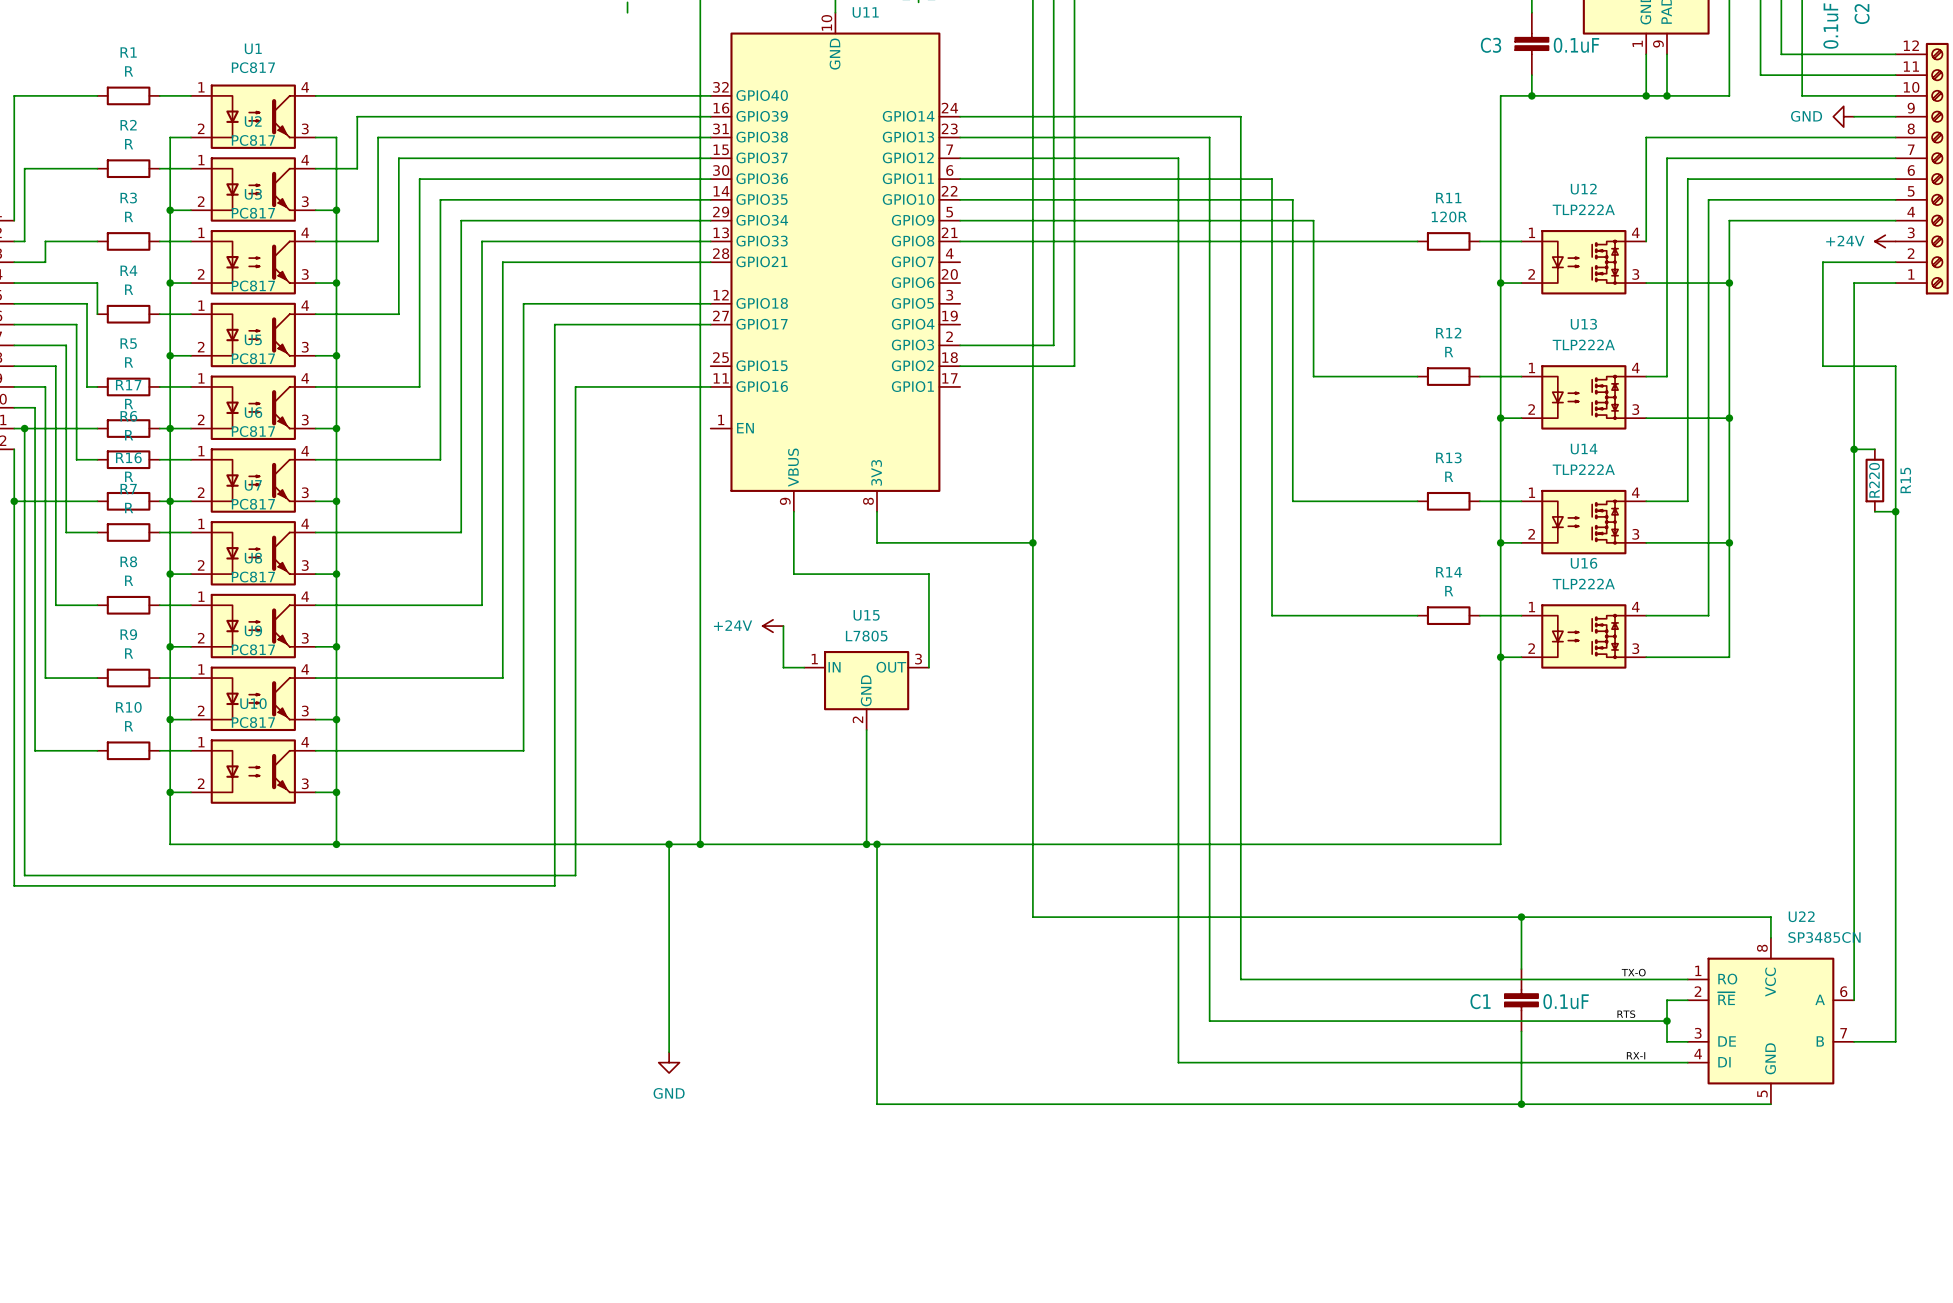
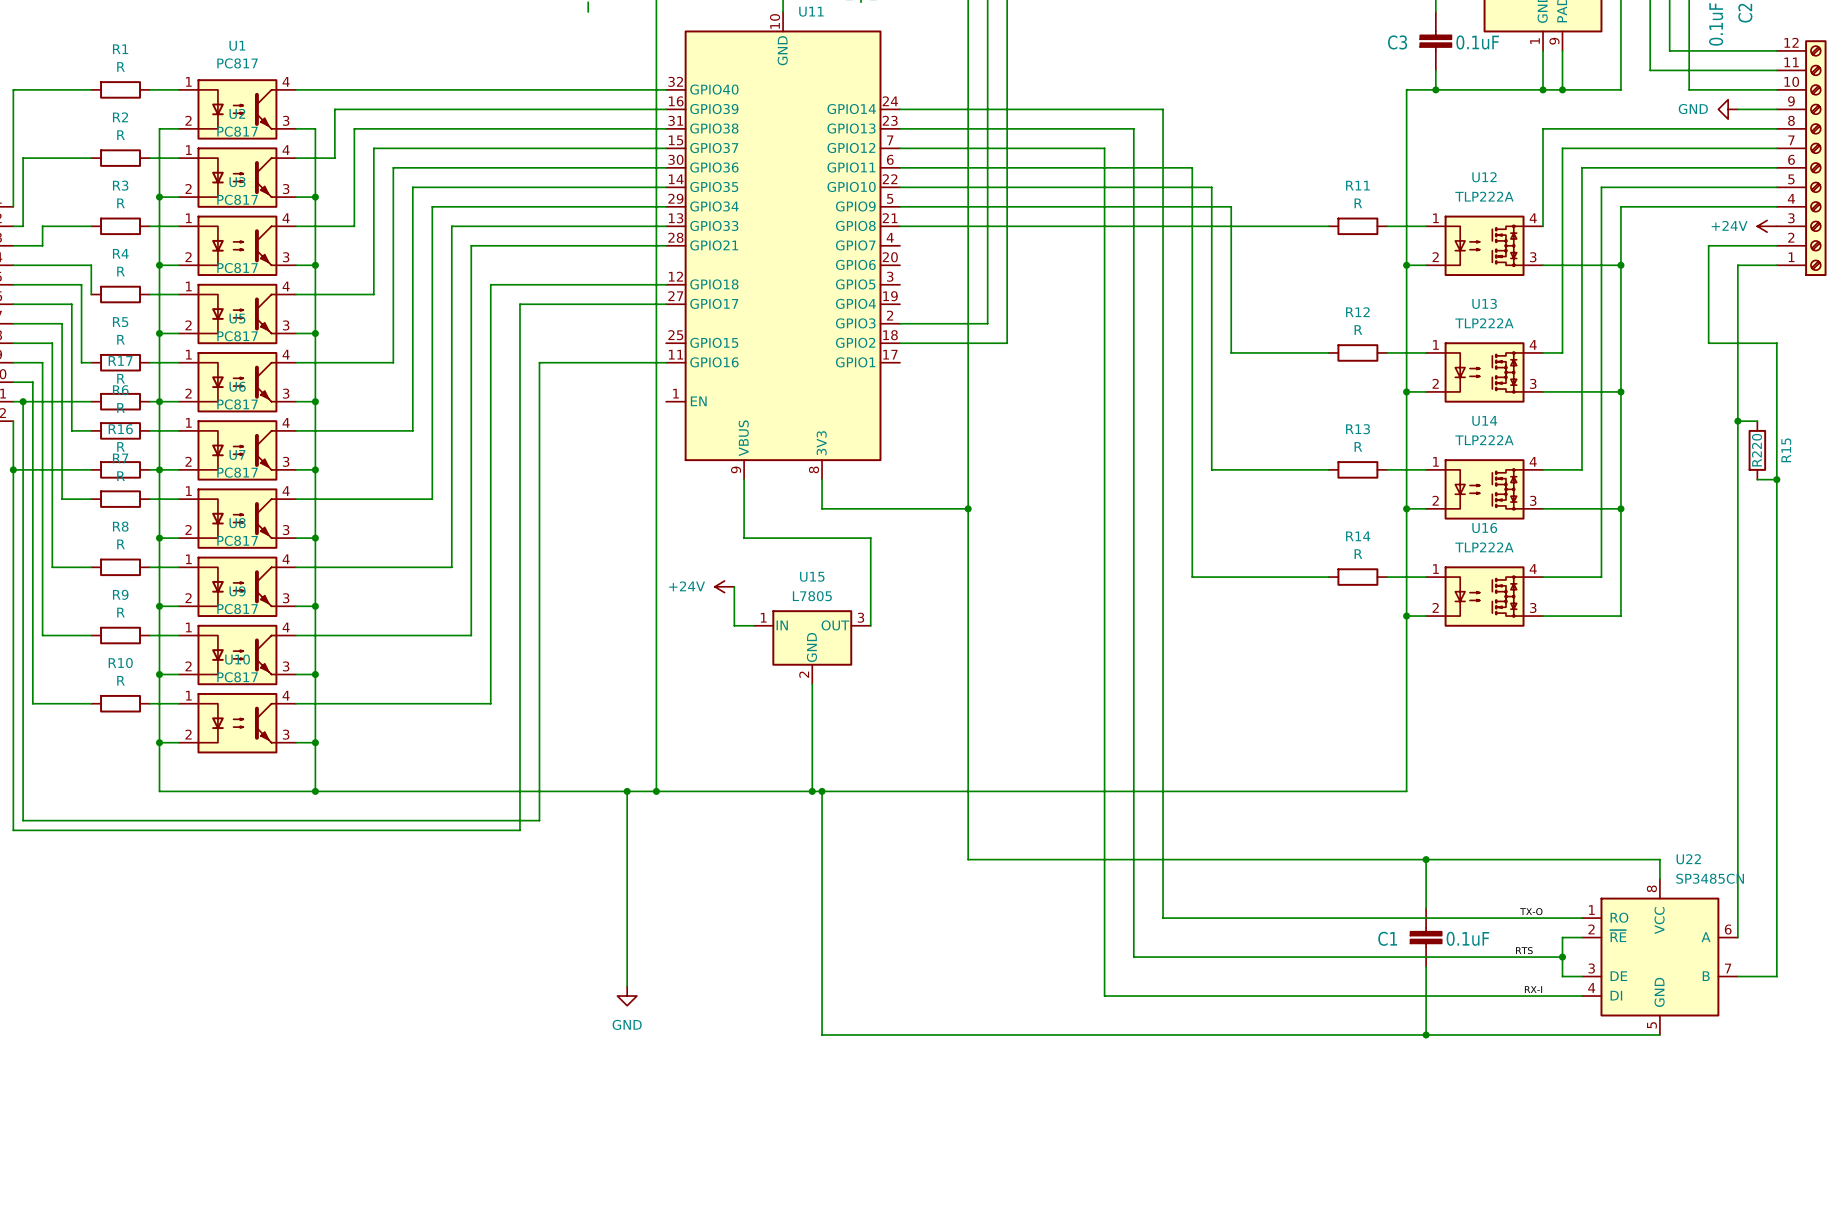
R11 value: 120R (1449, 216) -> R (1358, 203)

